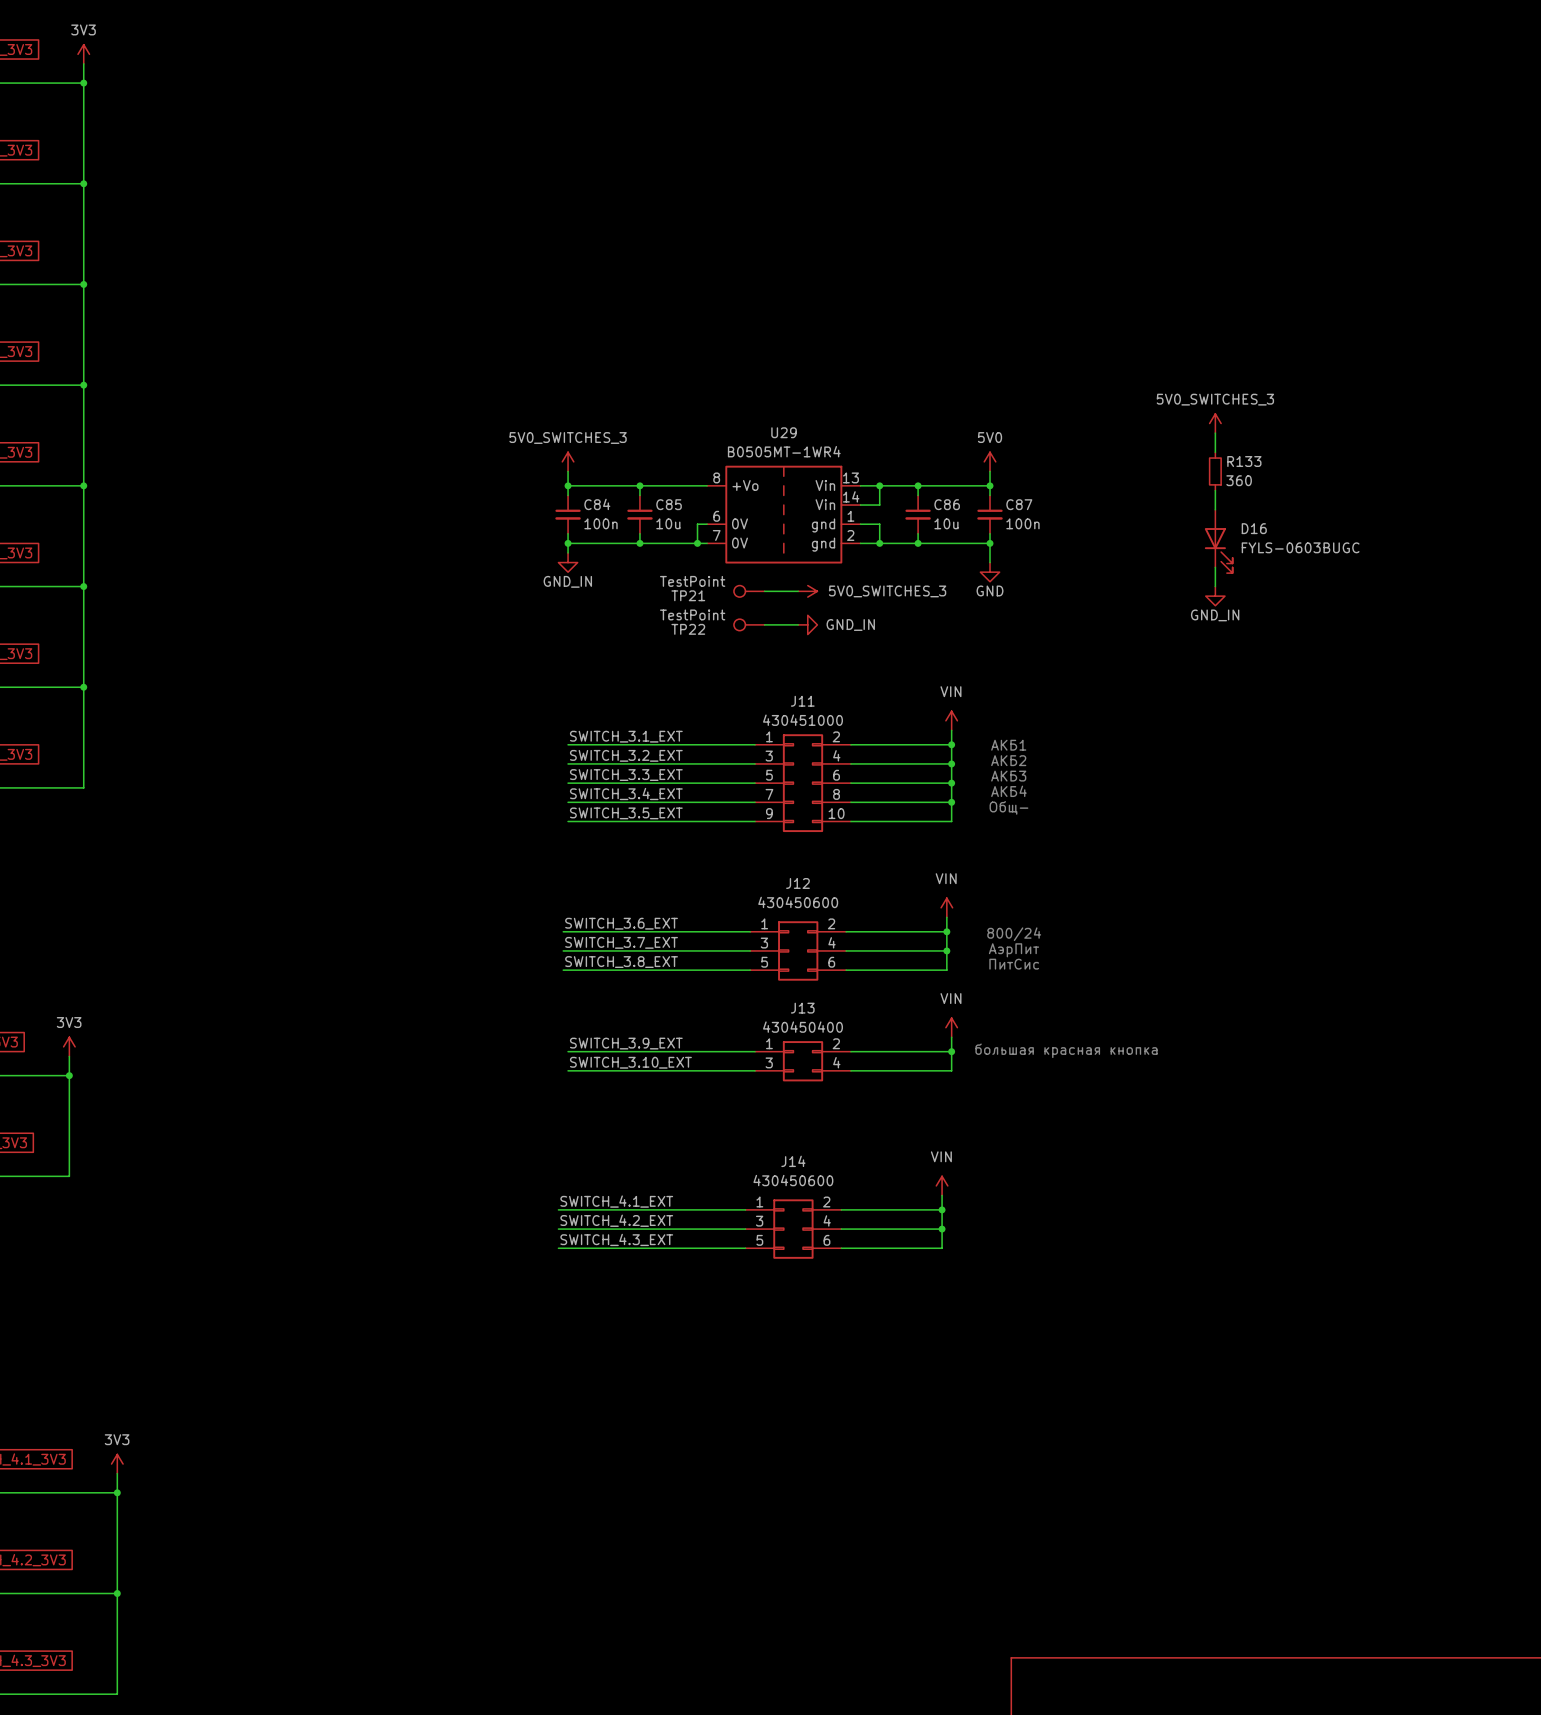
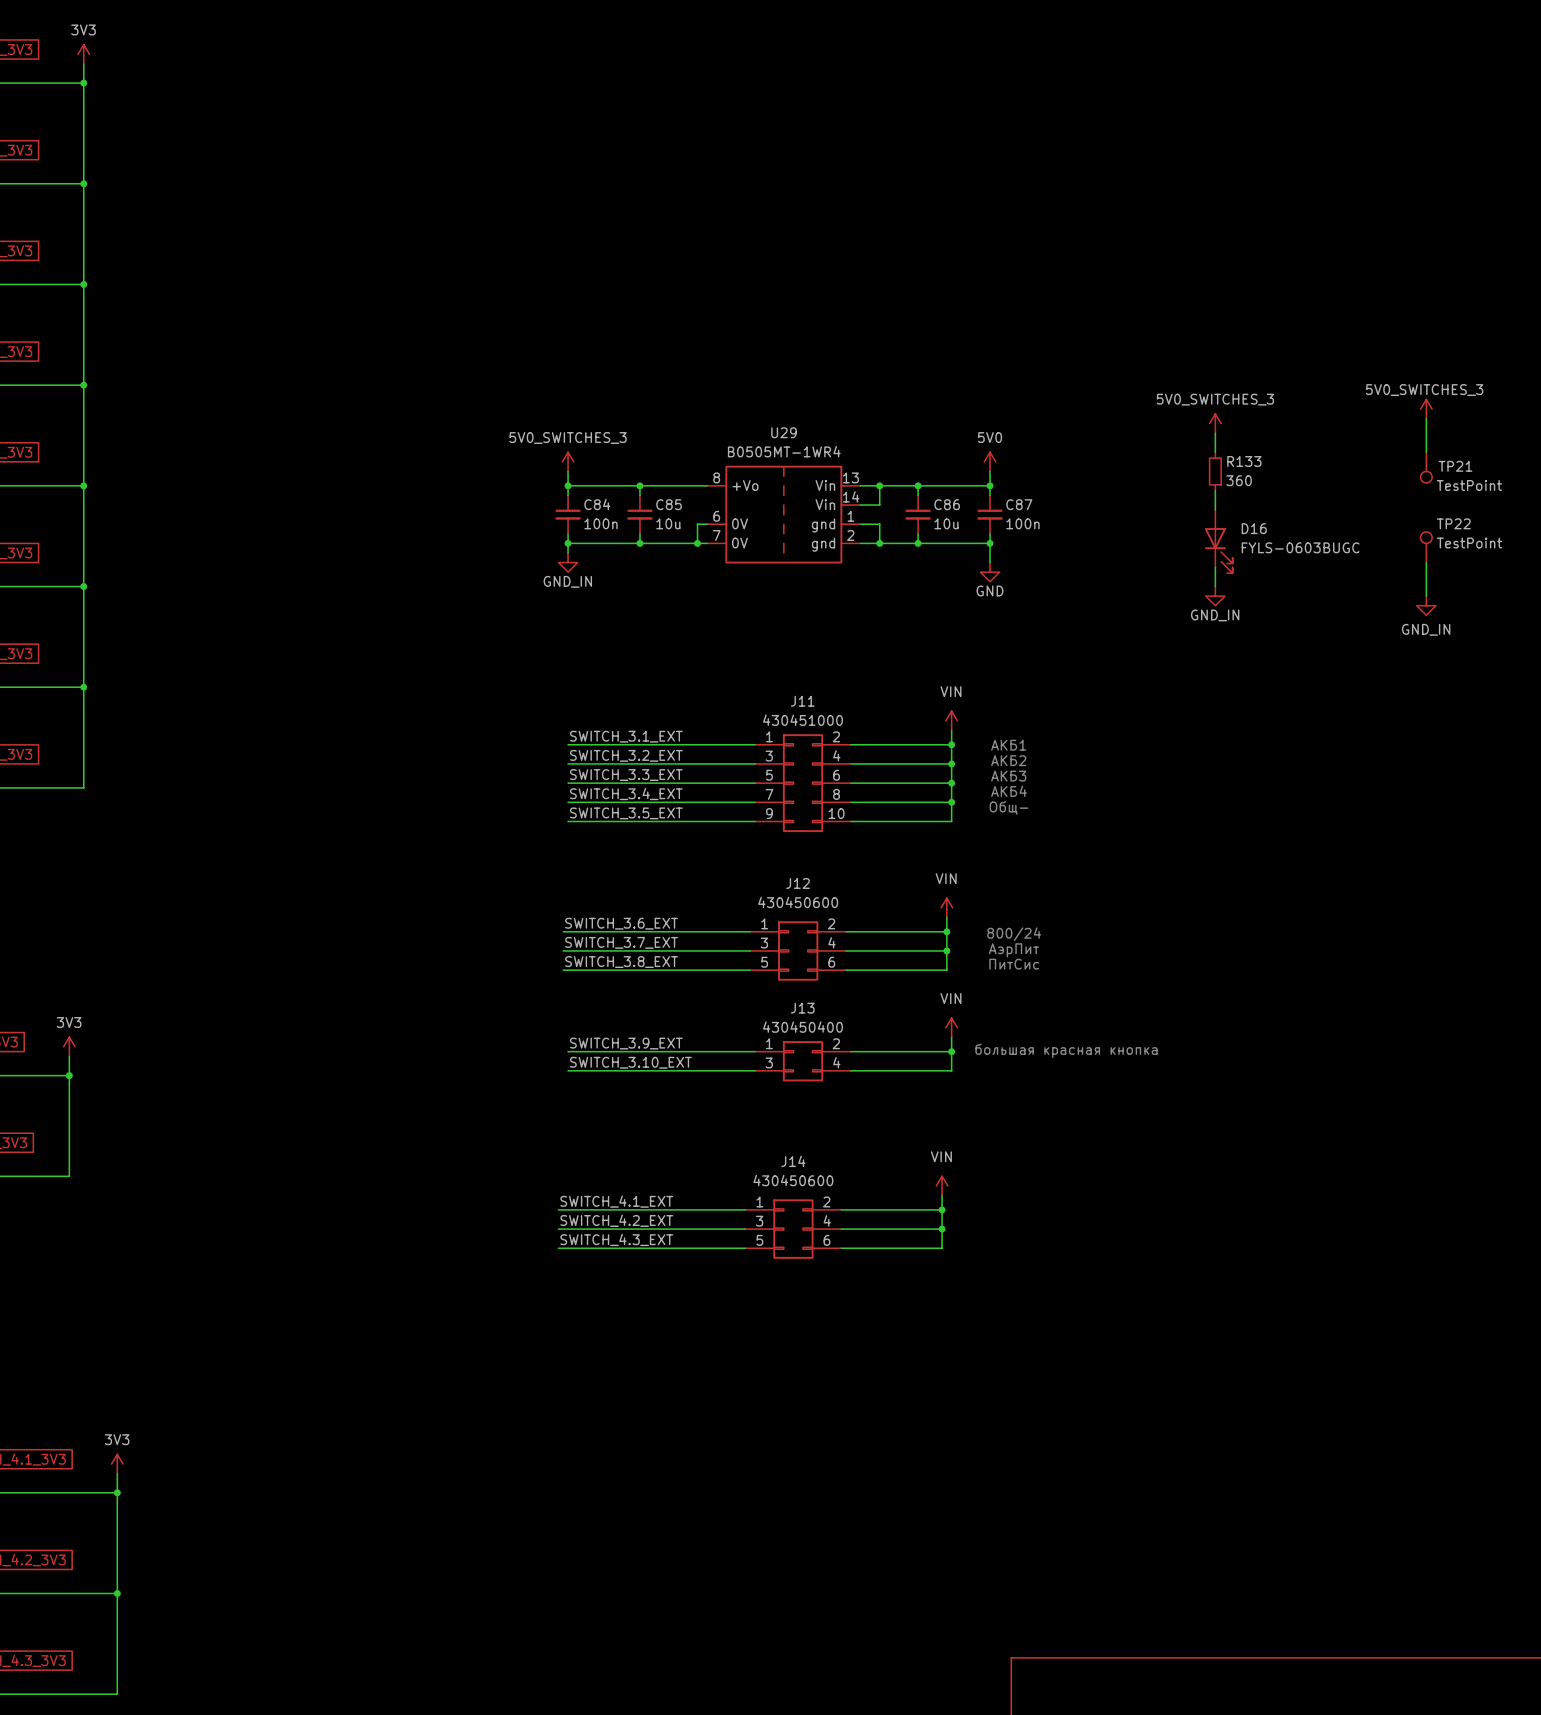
power symbol: none -> 5V0_SWITCHES_3 (1426, 409)
wire: none -> (1426, 418) (1426, 452)
wire: none -> (1426, 562) (1426, 596)
TP21 value position: TestPoint (692, 581) -> TestPoint (1469, 485)
TP21 rotation: 0° (739, 591) -> 90° counterclockwise (1426, 477)
TP21 position: (749, 591) -> (1426, 467)
wire: (764, 591) (798, 591) -> none
power symbol: 5V0_SWITCHES_3 (807, 591) -> none
TP21 name position: TP21 (688, 595) -> TP21 (1455, 466)
power symbol: none -> GND_IN (1426, 605)
TP22 value position: TestPoint (692, 614) -> TestPoint (1469, 543)
TP22 rotation: 0° (739, 624) -> 90° clockwise (1426, 537)
TP22 position: (749, 624) -> (1426, 547)
wire: (764, 624) (798, 624) -> none
power symbol: GND_IN (807, 624) -> none
TP22 name position: TP22 (688, 629) -> TP22 (1453, 523)

